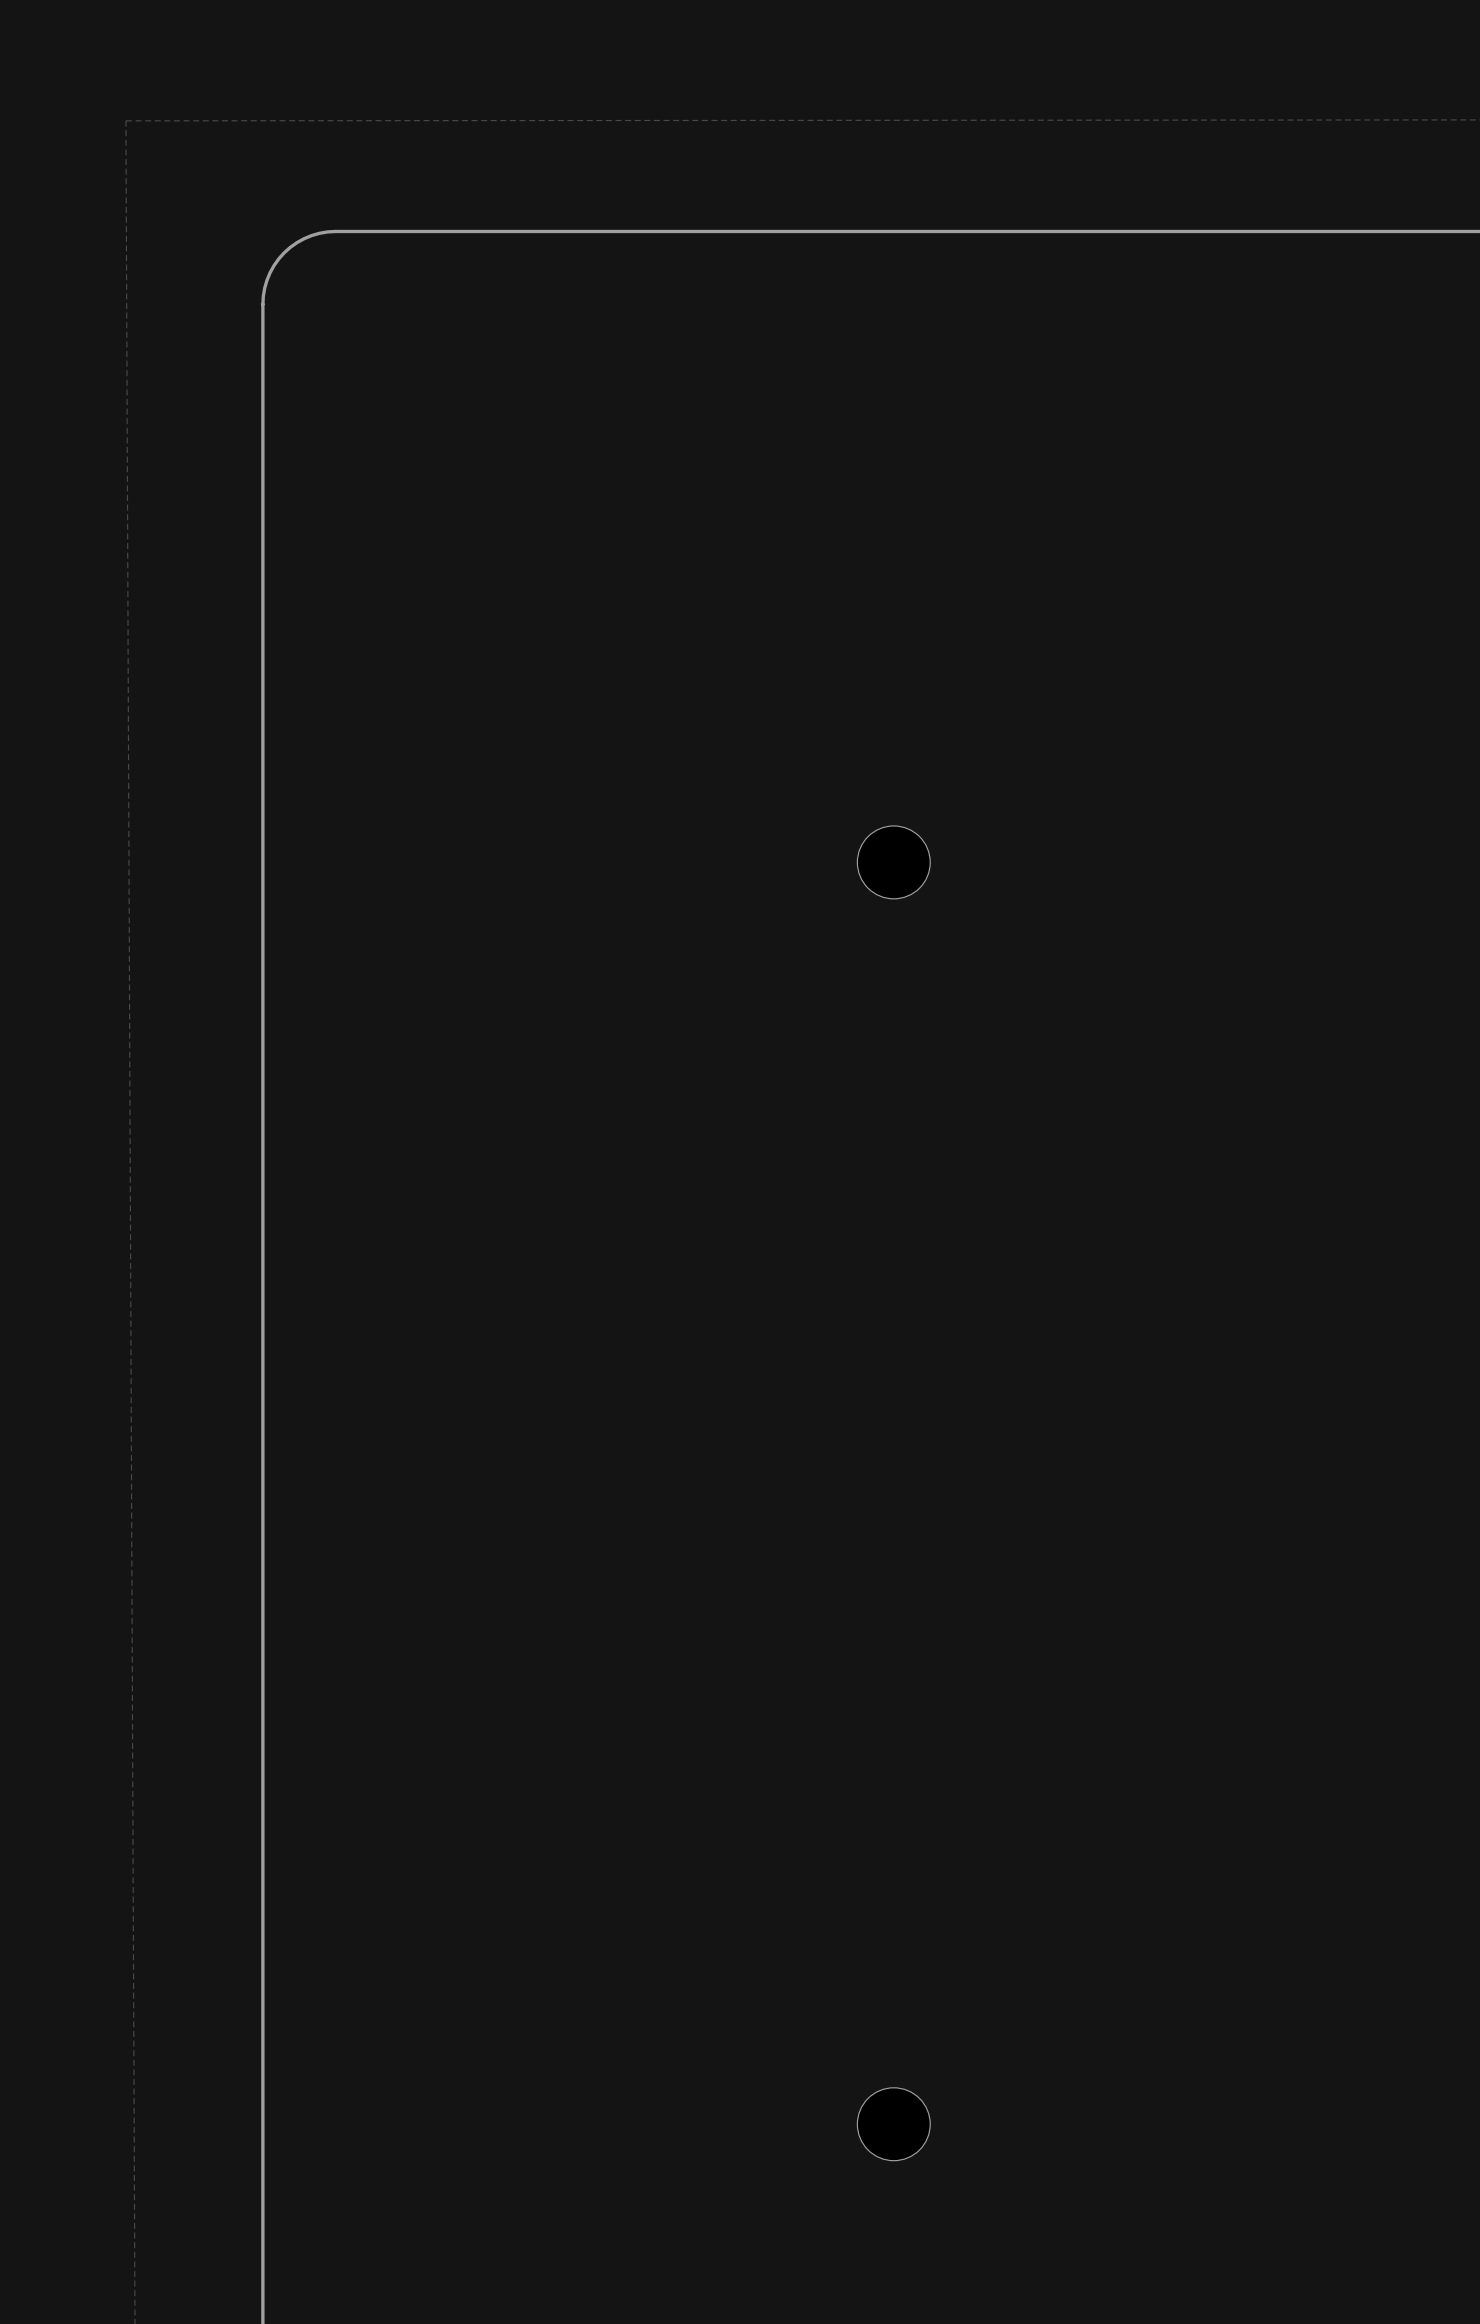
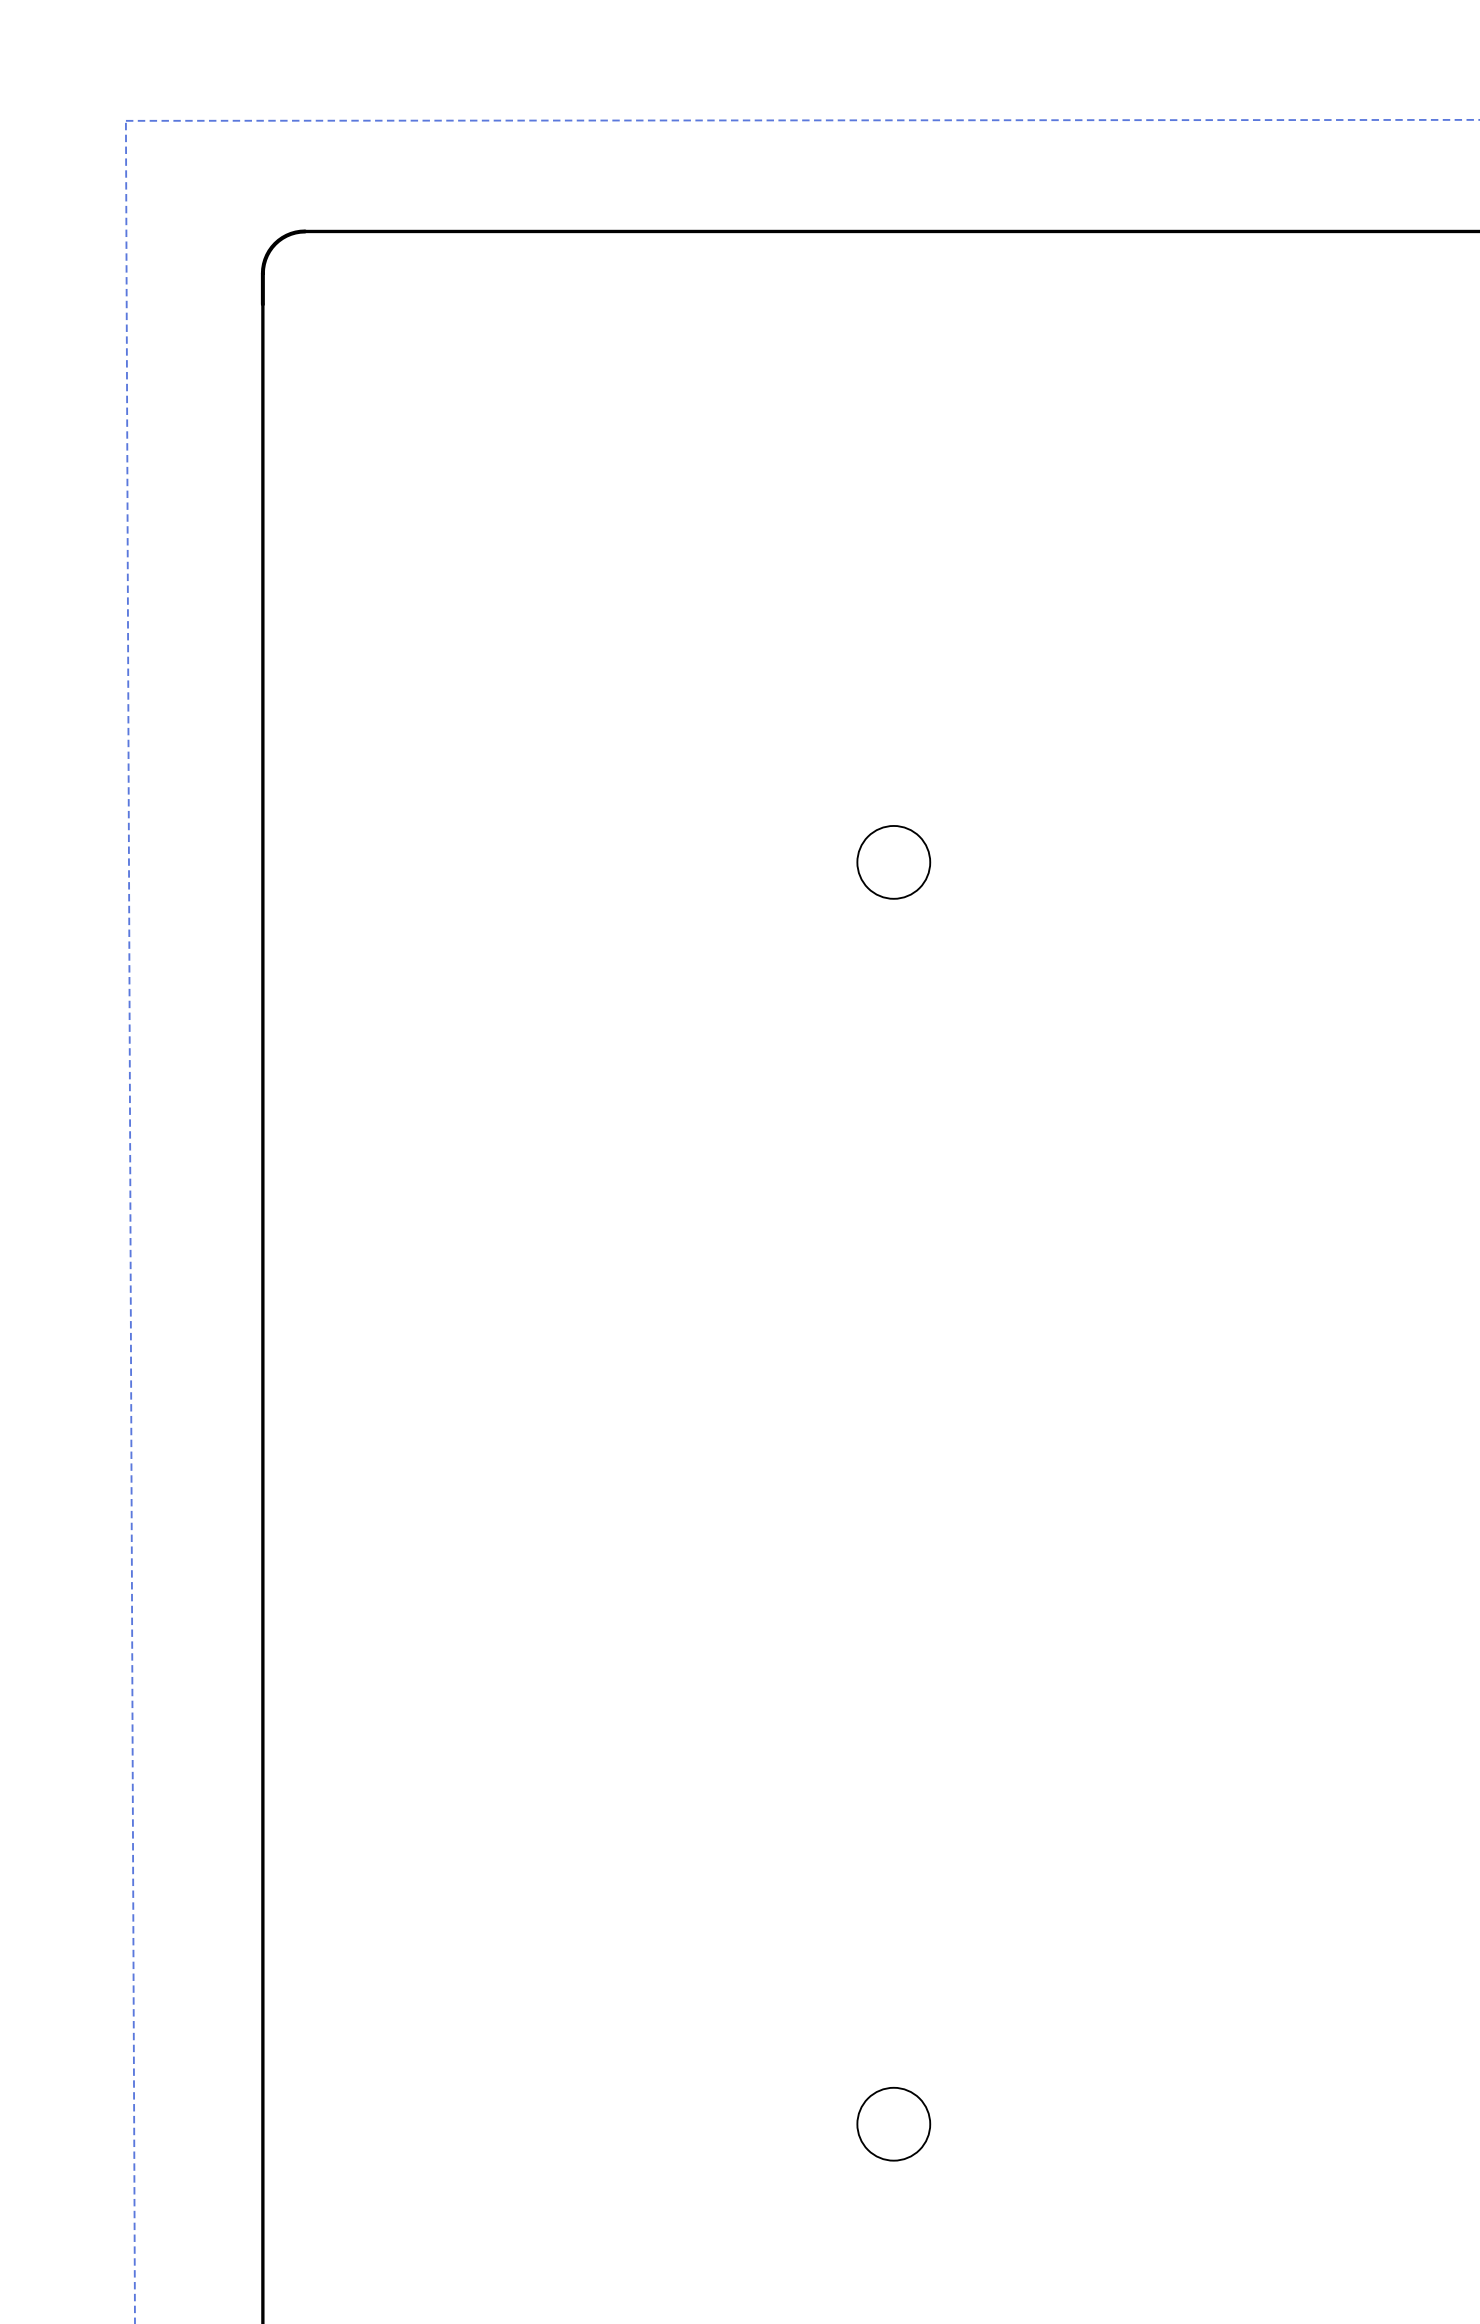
board edge: (335, 231) (319, 233) (304, 238) (284, 252) (270, 272) (264, 288) (262, 304) -> (335, 231) (295, 232) (286, 235) (275, 243) (269, 251) (263, 264) (262, 304)

